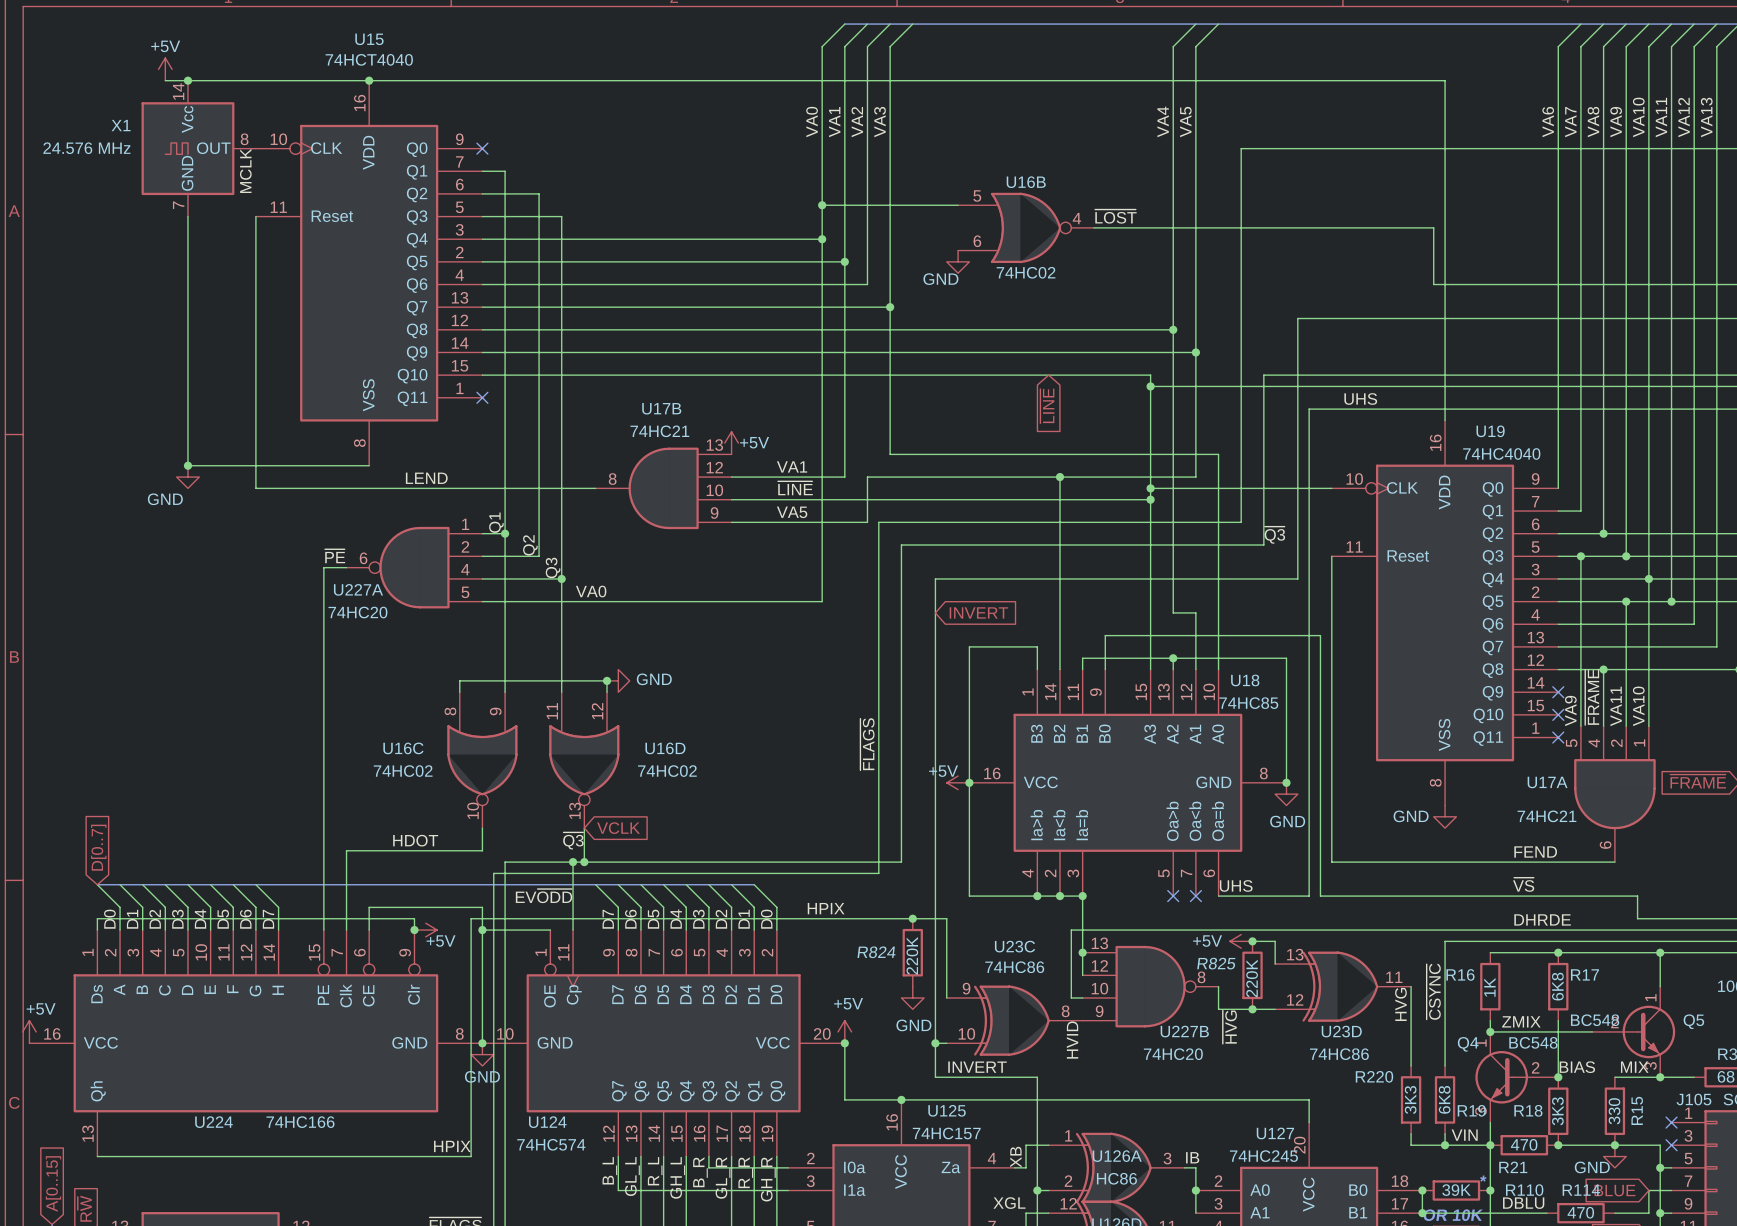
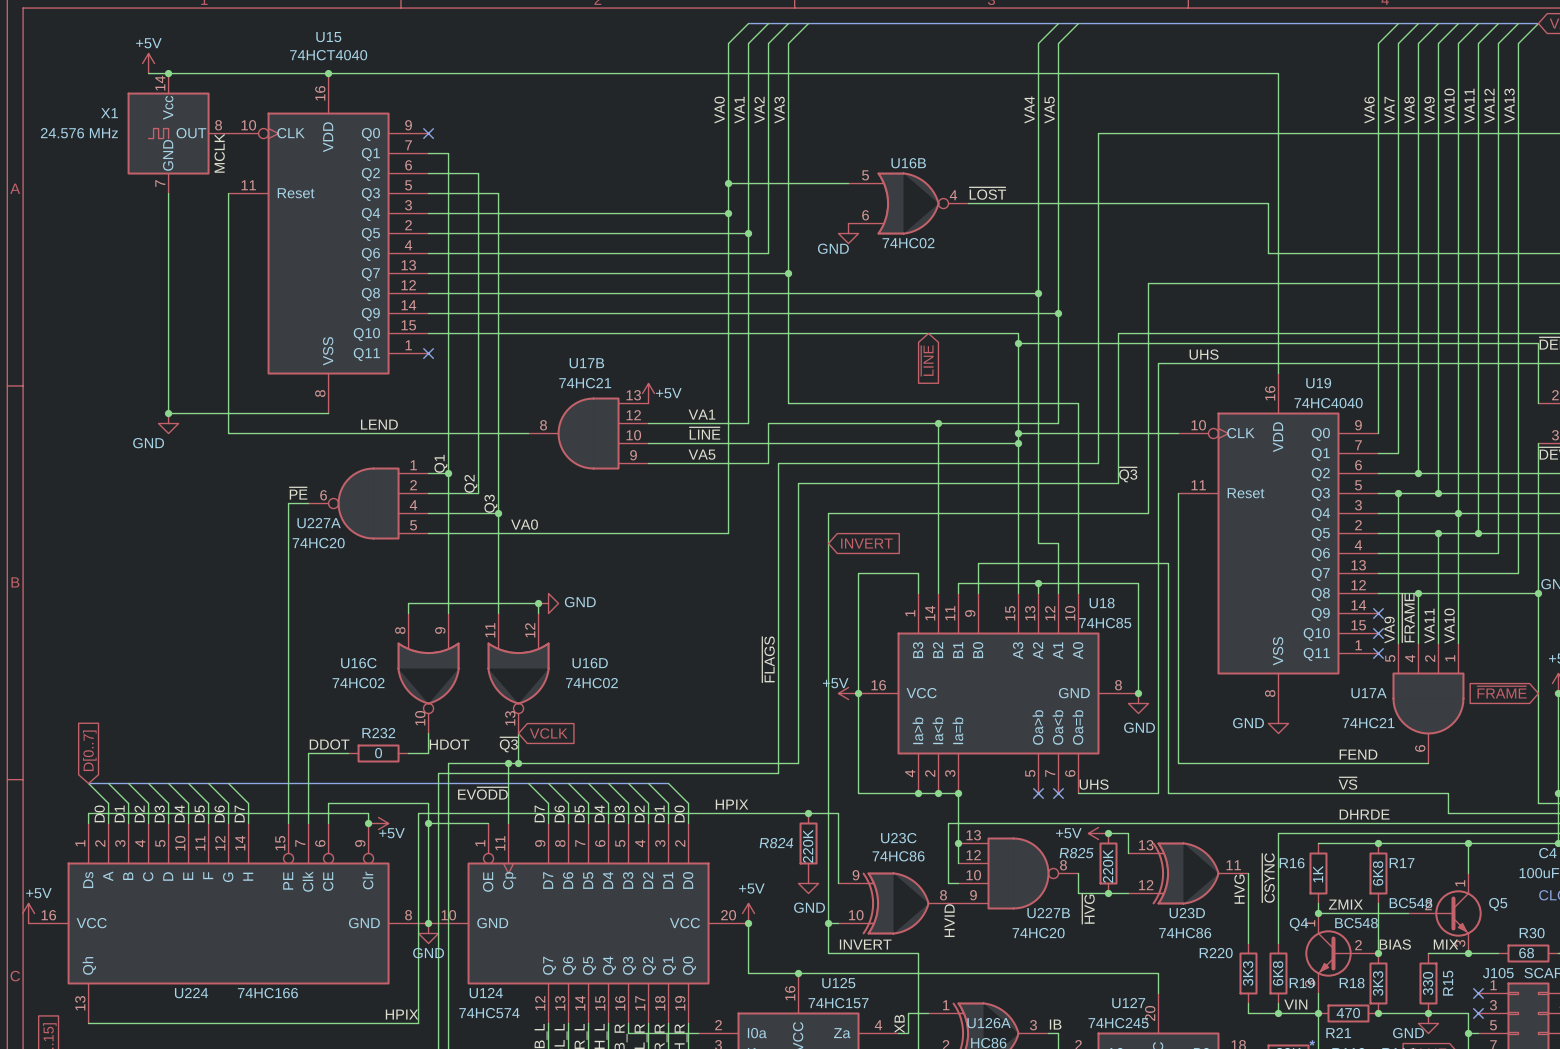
label: none -> DDOT (329, 744)
label position: HDOT (415, 840) -> HDOT (449, 744)
wire: (391, 850) (459, 850) -> none
R232: none -> 0 (378, 753)

